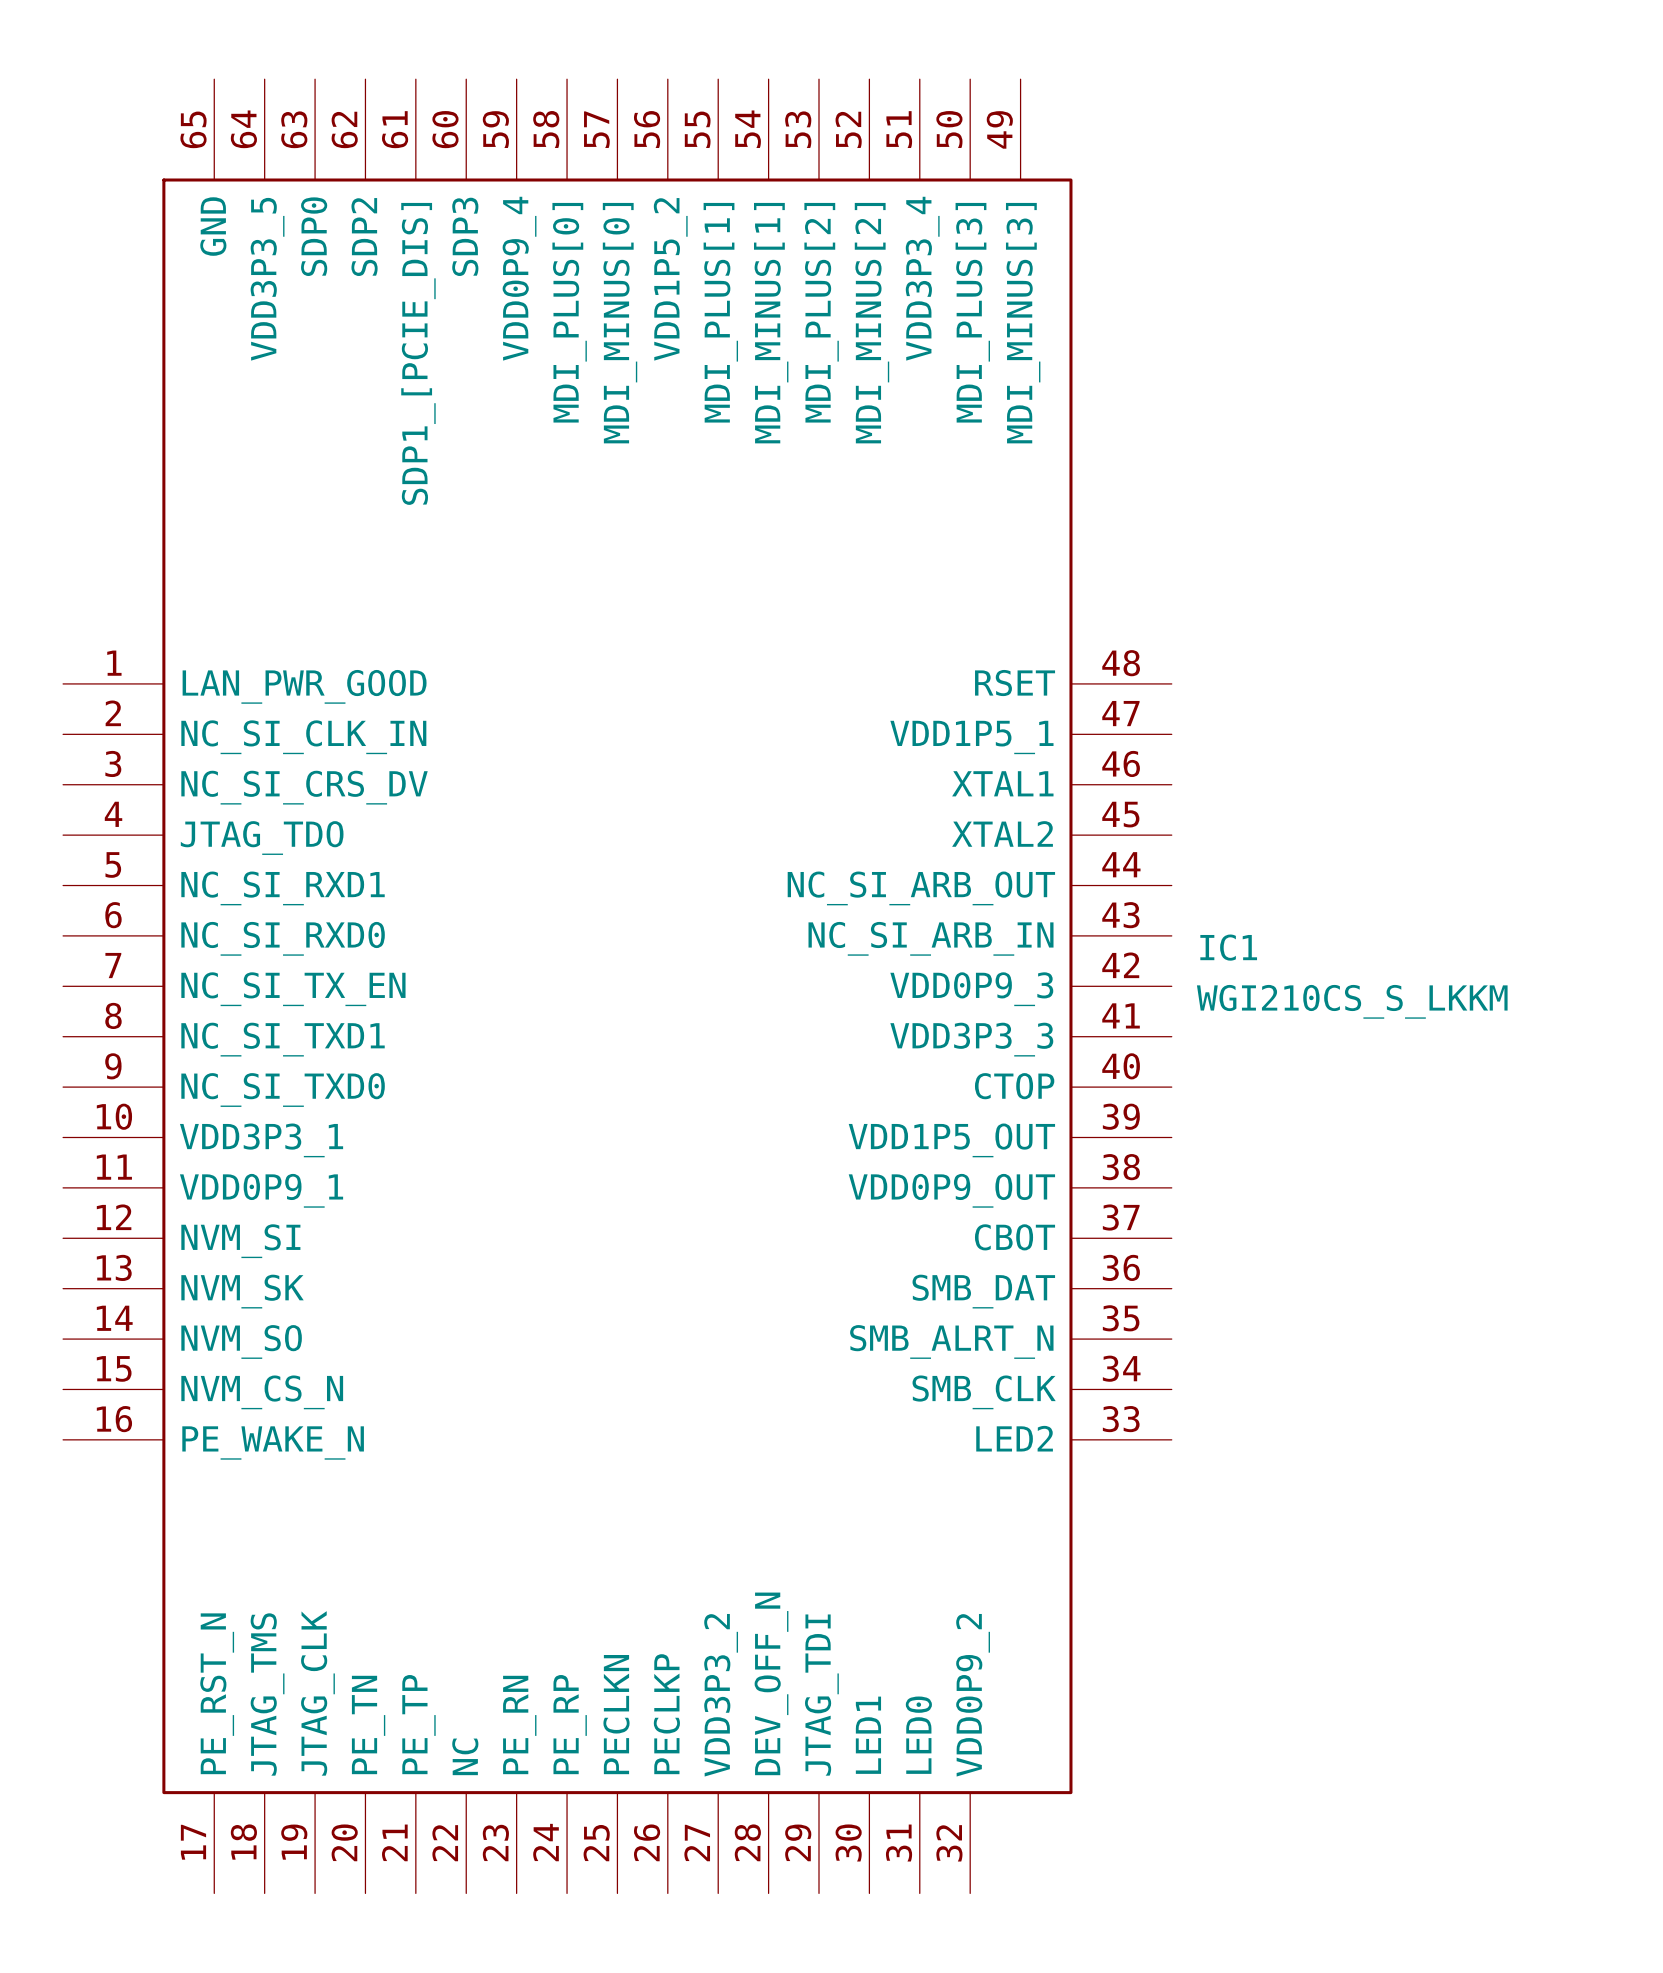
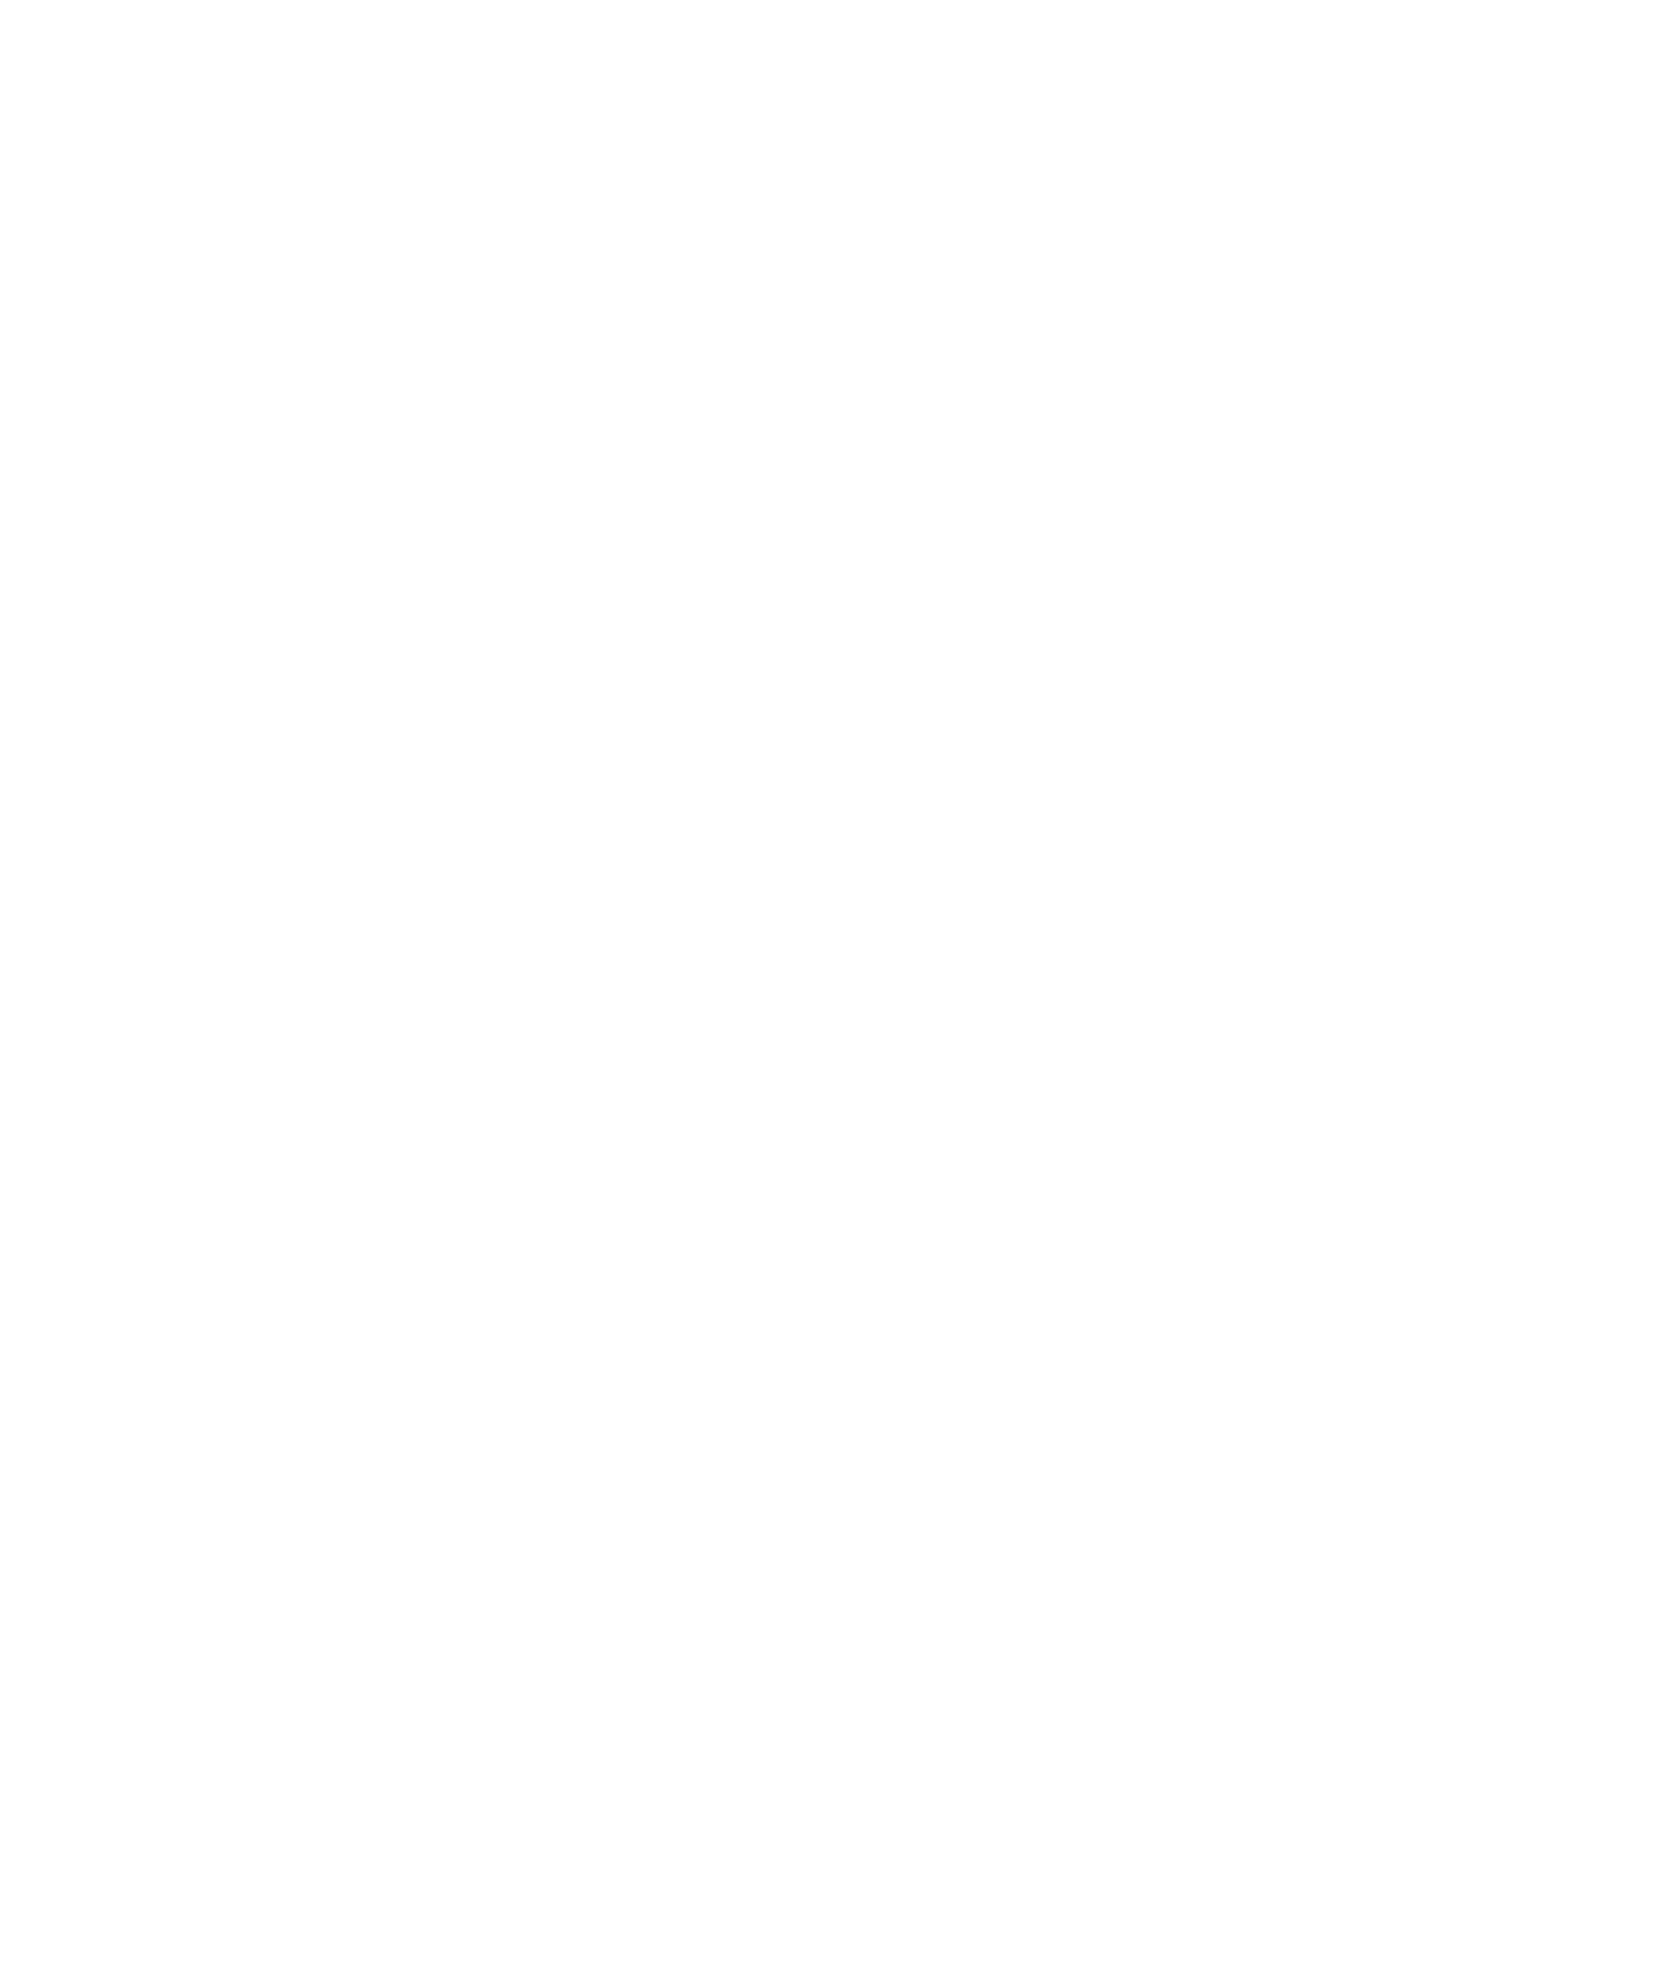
IC1: WGI210CS_S_LKKM (617, 986) -> none

